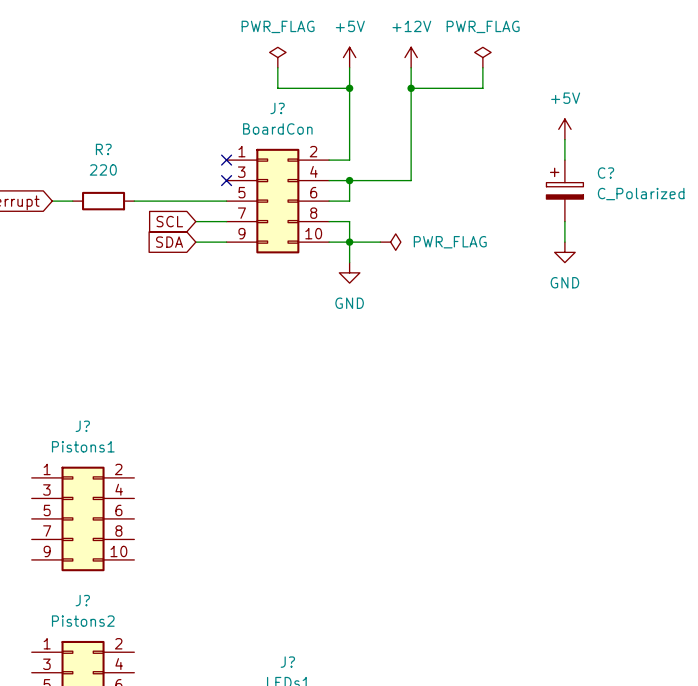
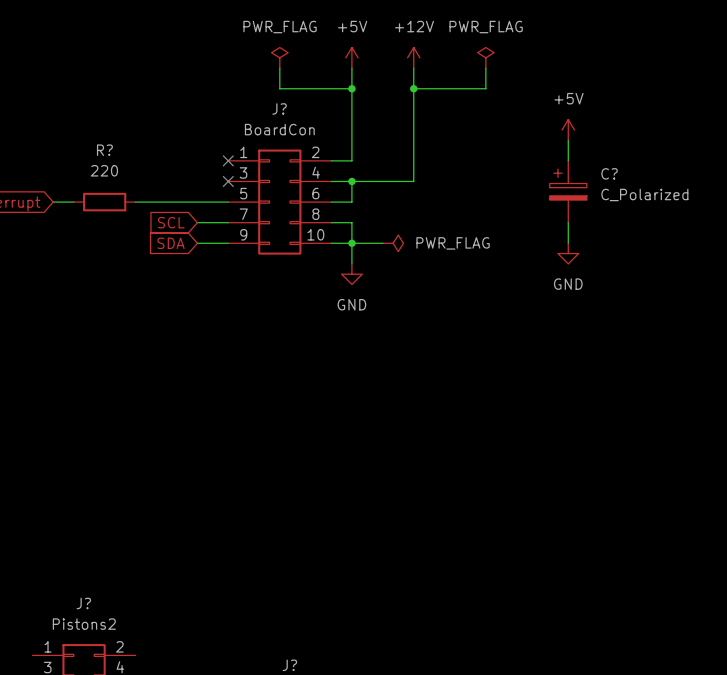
J?: Pistons1 (83, 518) -> none

